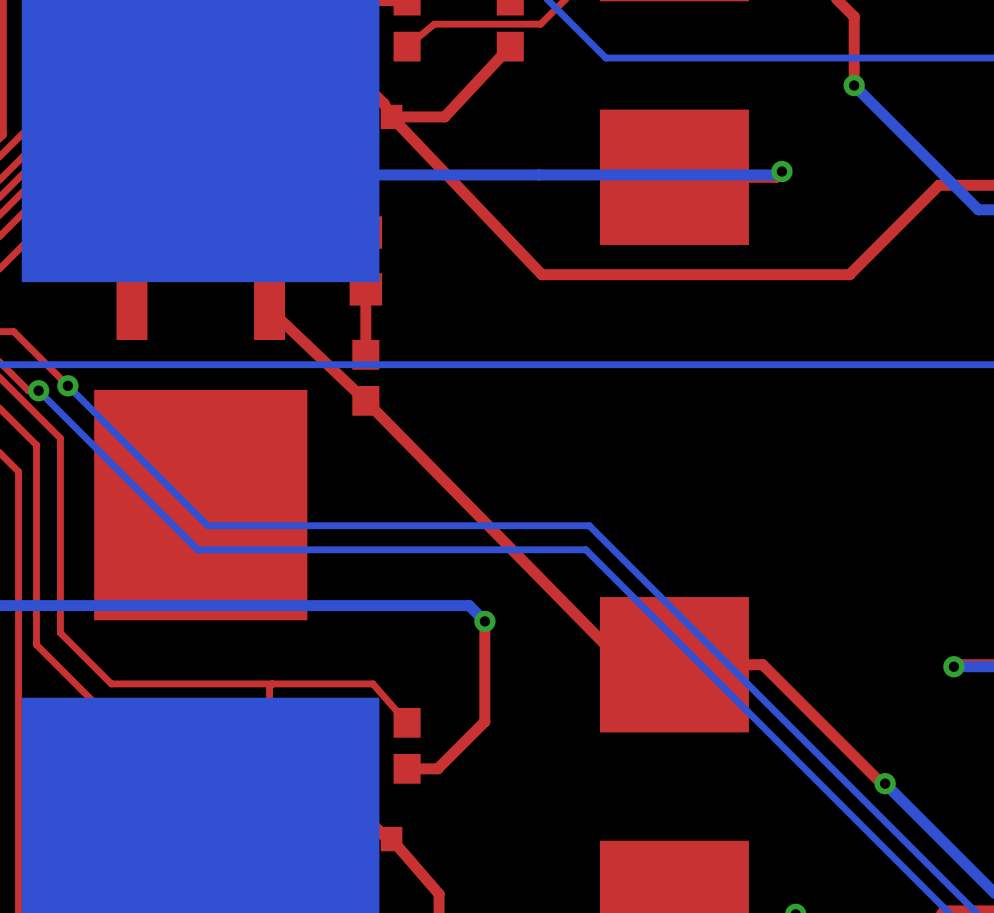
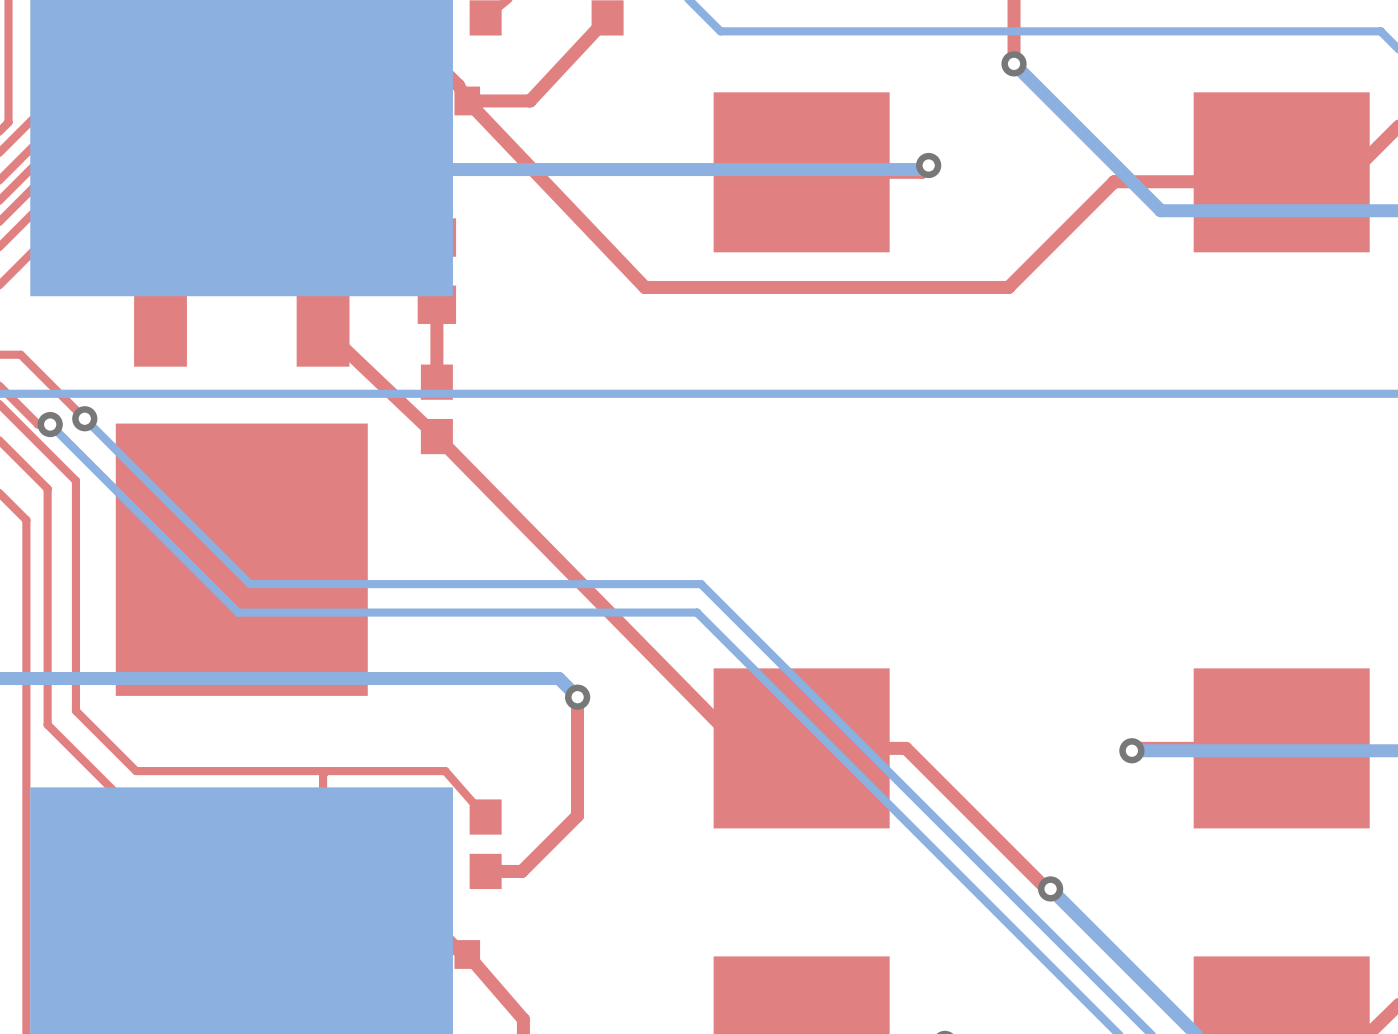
part footprint: [94, 271, 308, 621] -> [115, 244, 368, 696]

